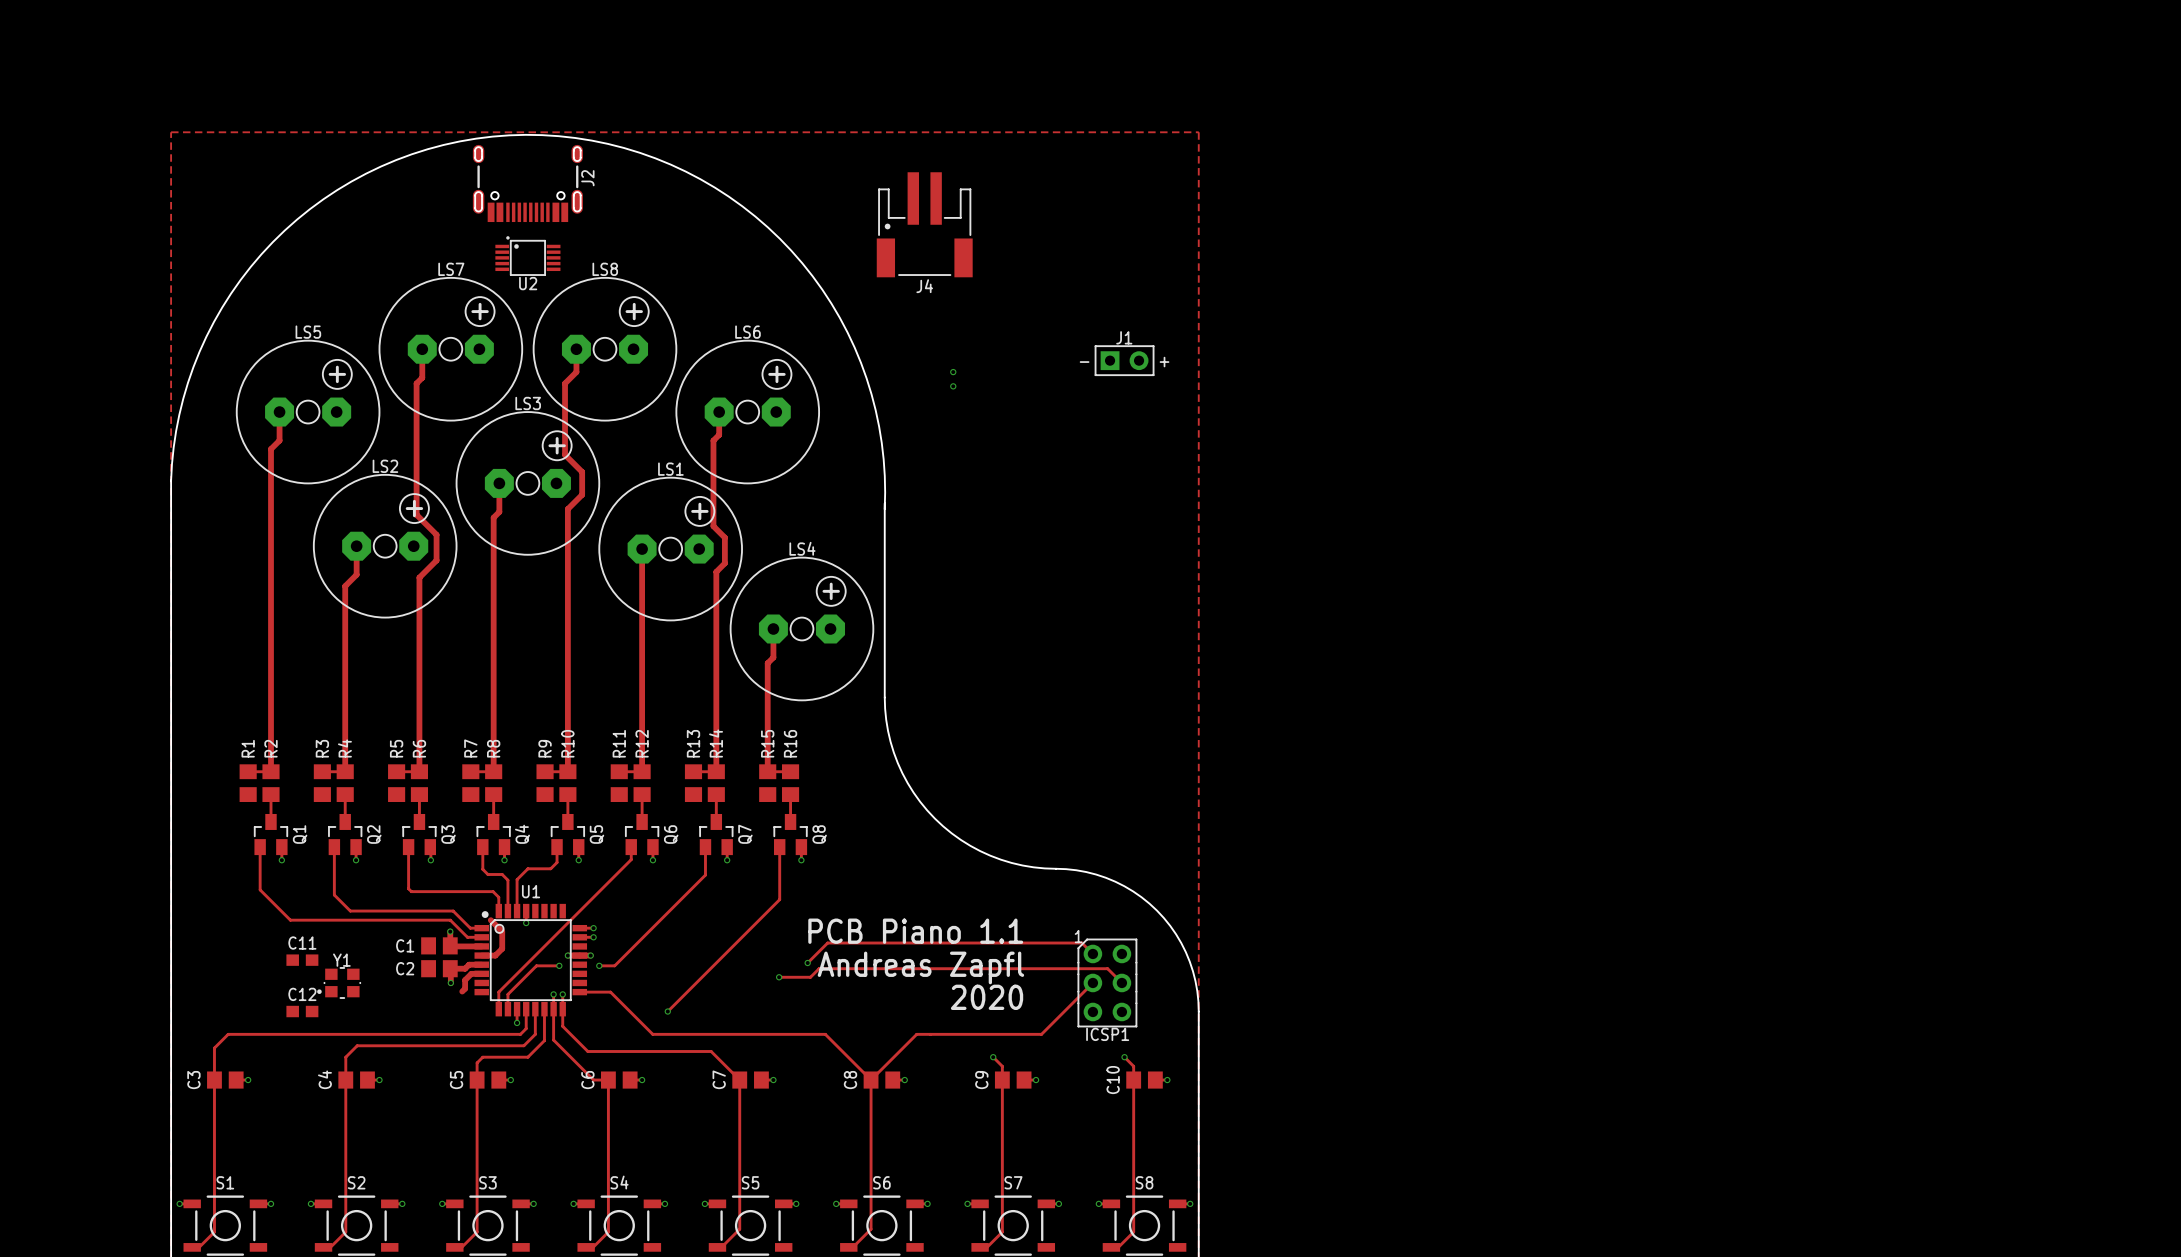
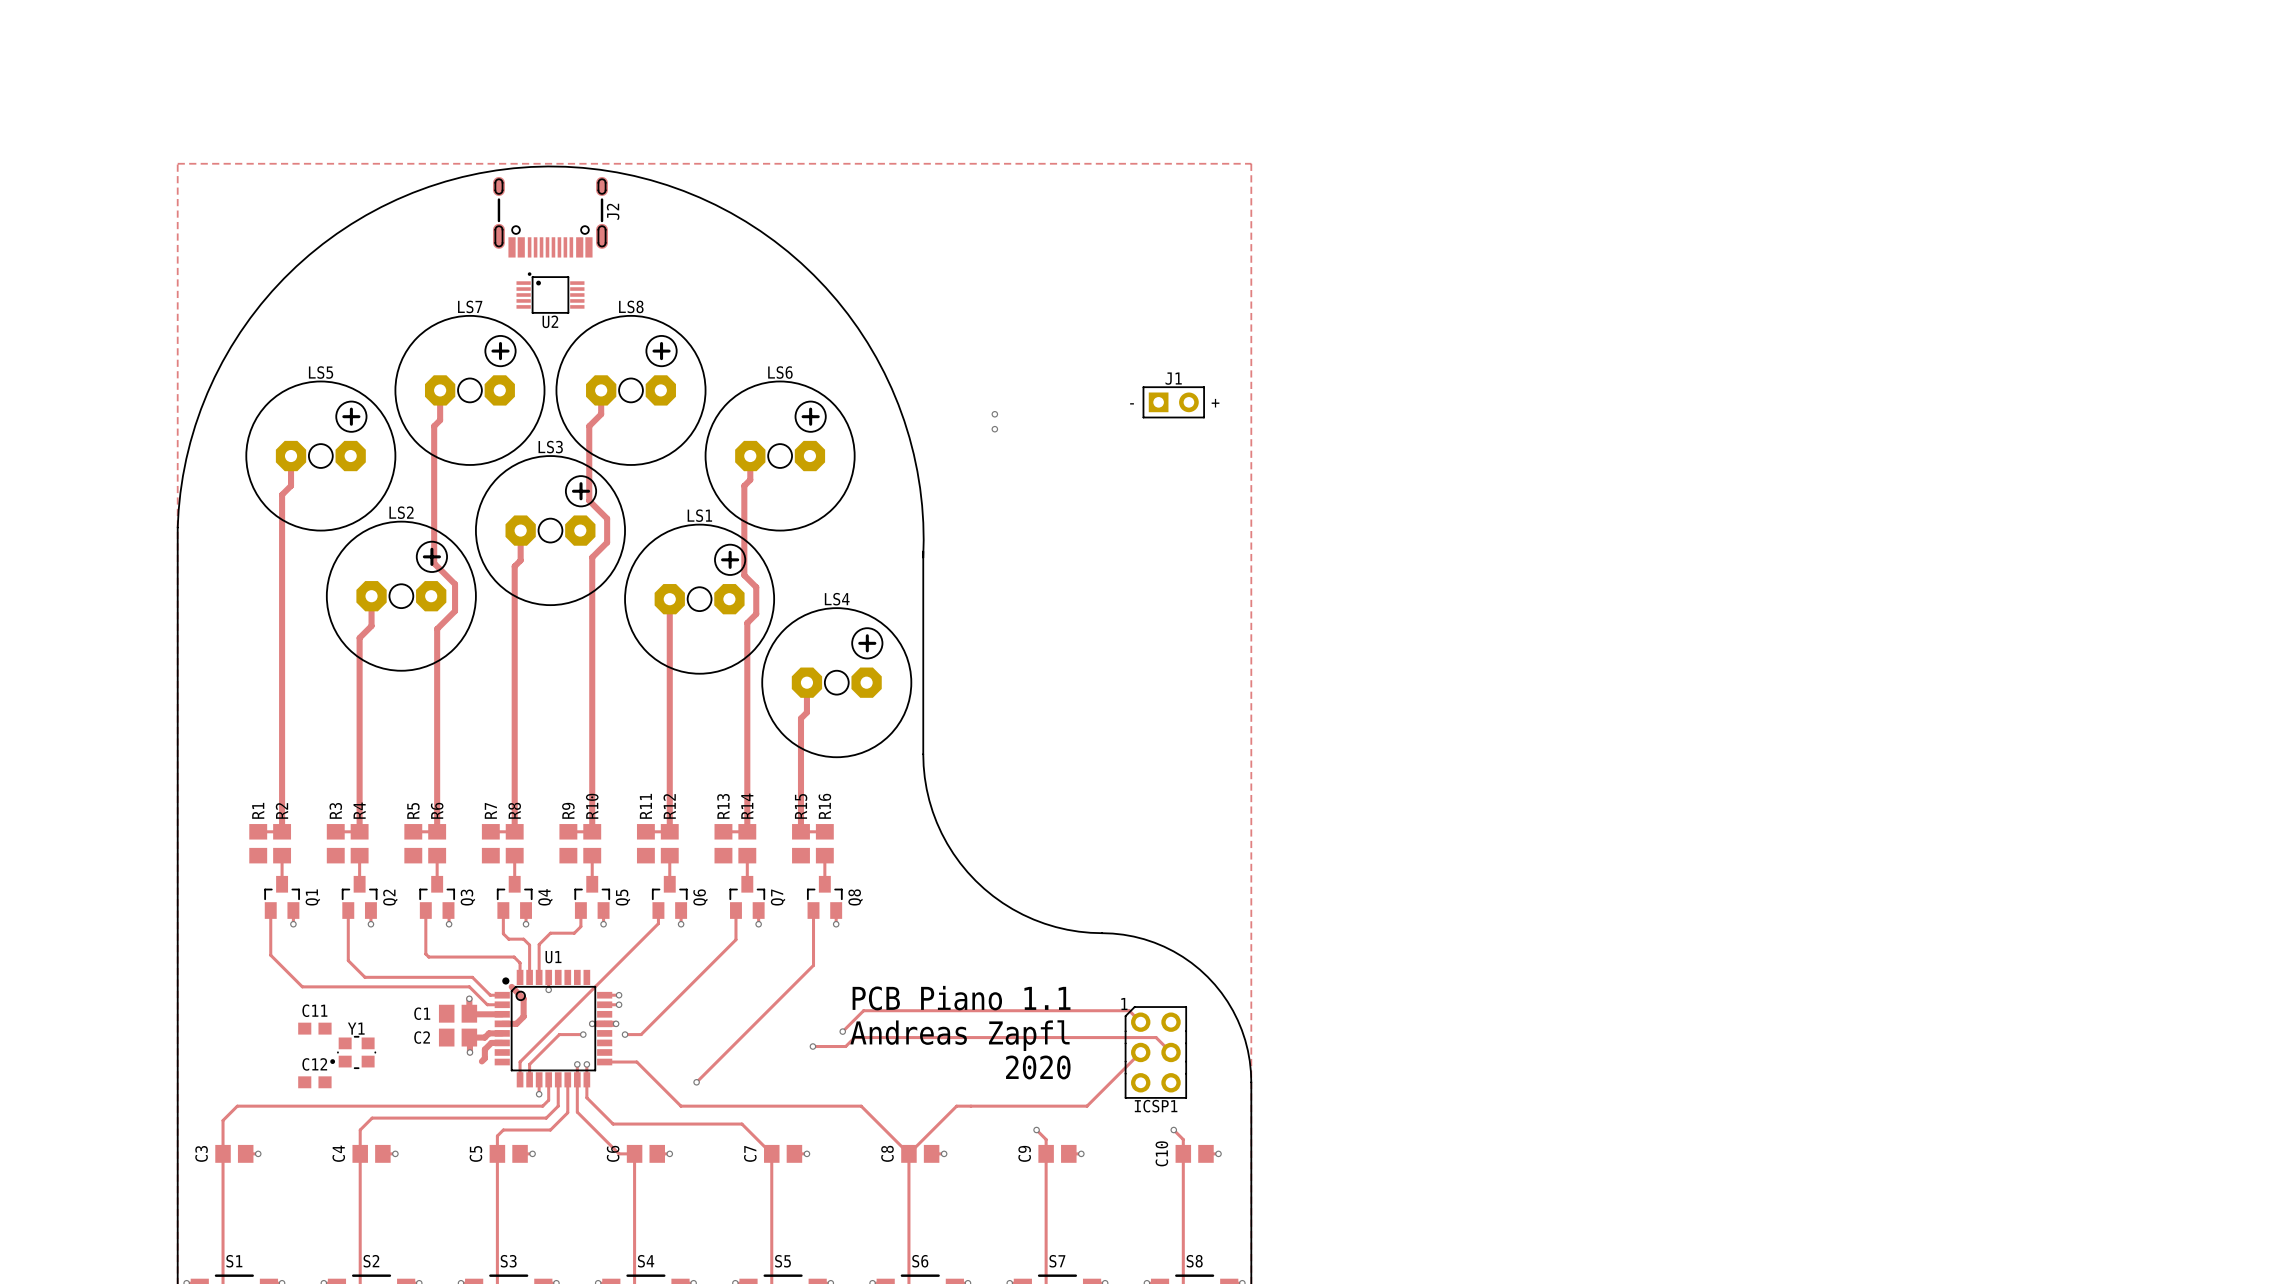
J4: (924, 224) -> none

